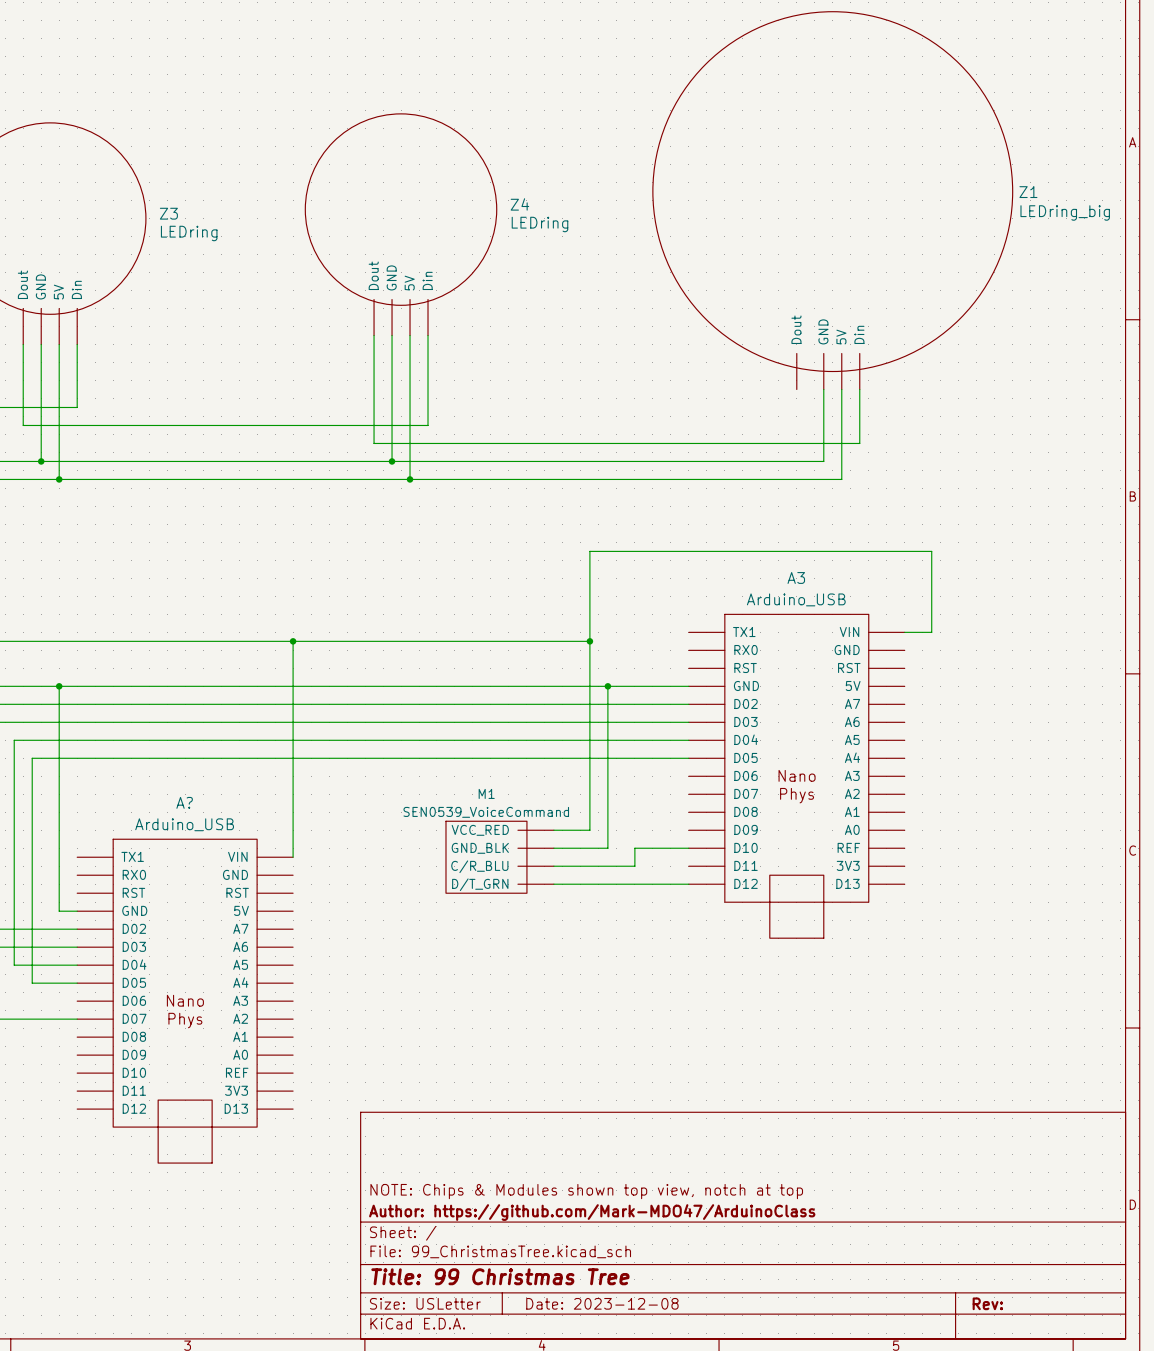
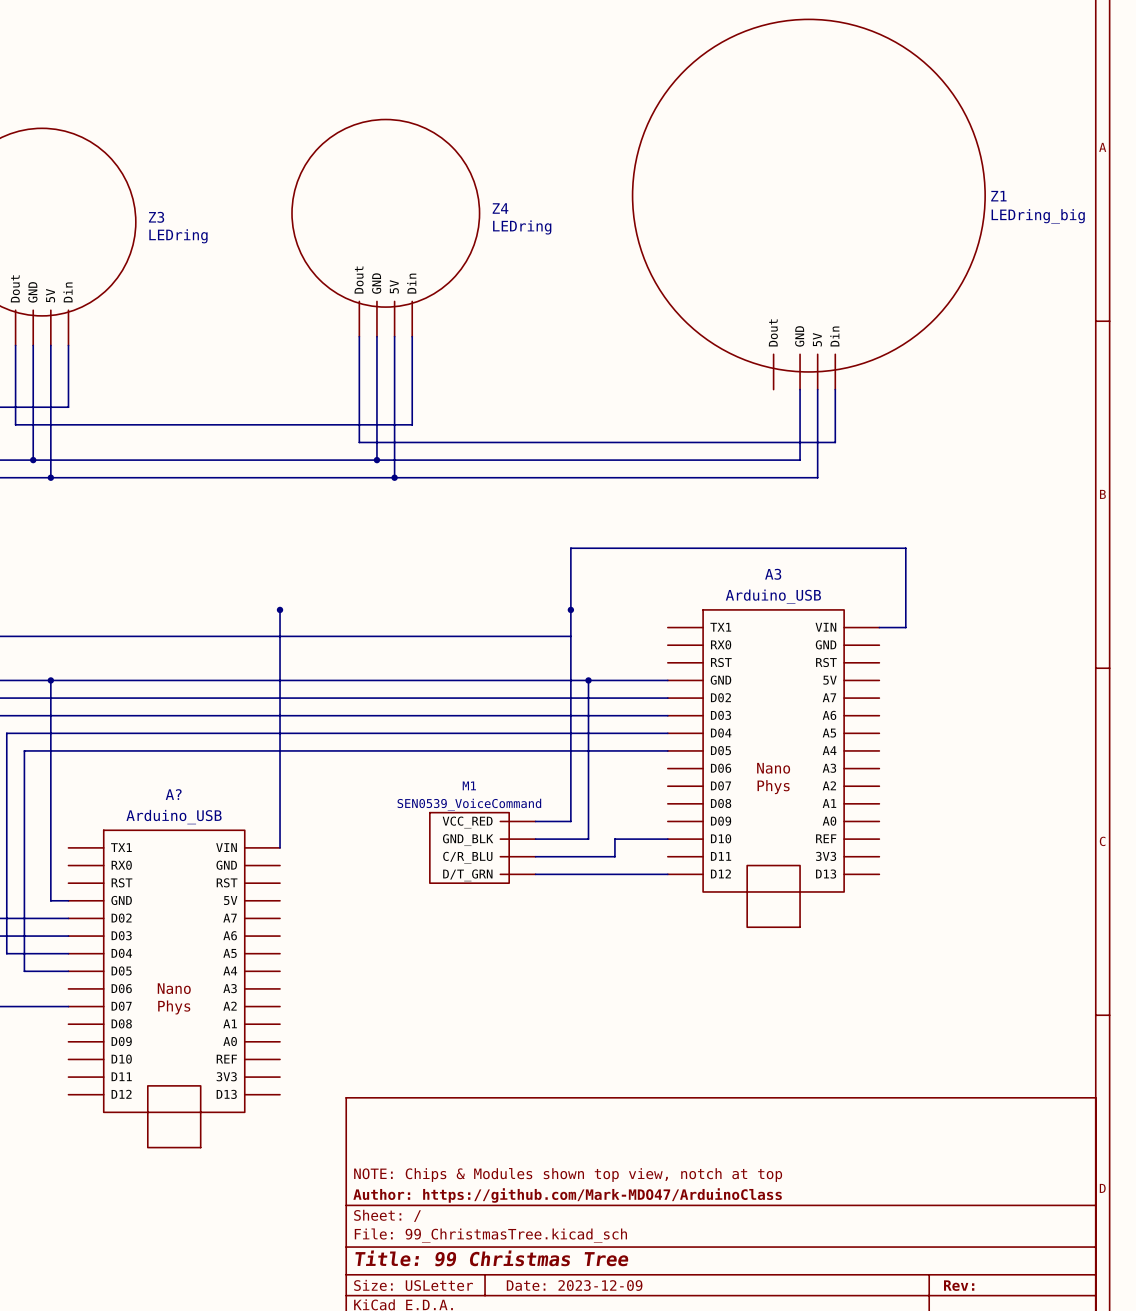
wire: none -> (280, 609) (280, 636)
junction position: (293, 641) -> (280, 609)
junction position: (589, 641) -> (570, 609)
title block: Date: 2023-12-08 (602, 1303) -> Date: 2023-12-09 (574, 1285)

